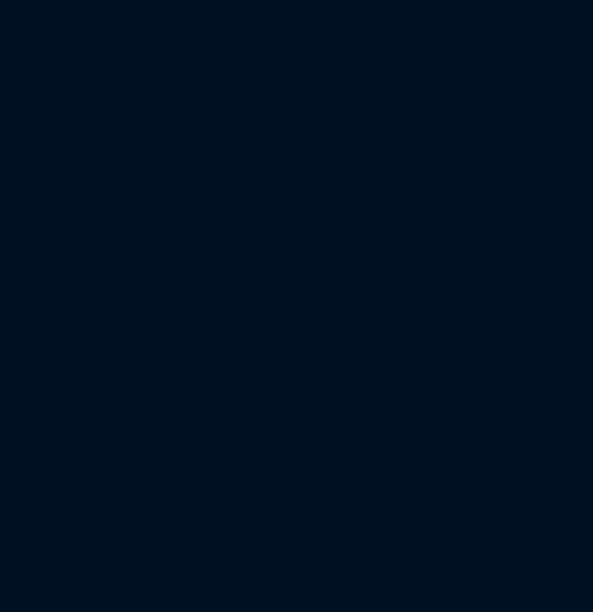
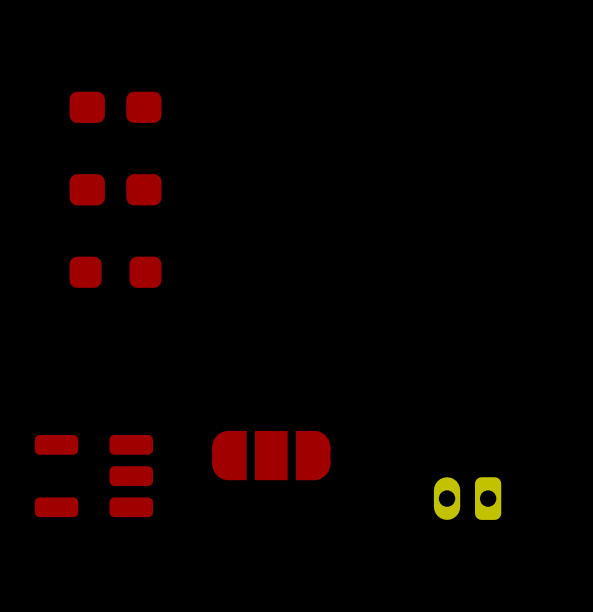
part: none -> (115, 107)
part: none -> (115, 189)
part: none -> (115, 272)
part: none -> (271, 455)
part: none -> (93, 476)
part: none -> (467, 498)

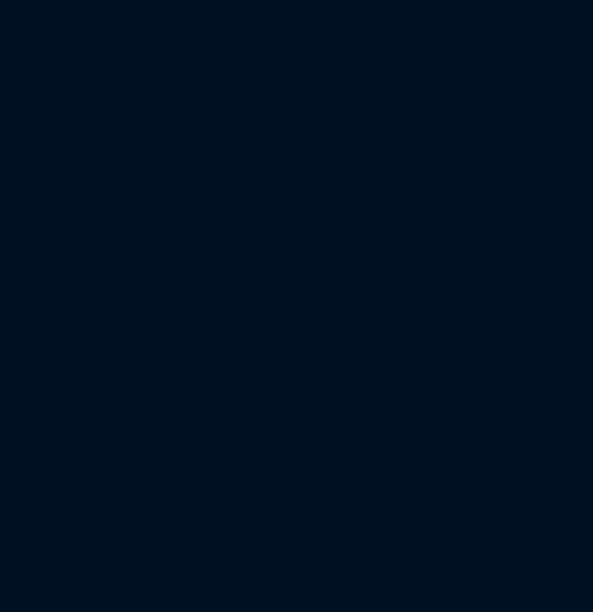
part: (115, 107) -> none
part: (115, 189) -> none
part: (115, 272) -> none
part: (271, 455) -> none
part: (93, 476) -> none
part: (467, 498) -> none

